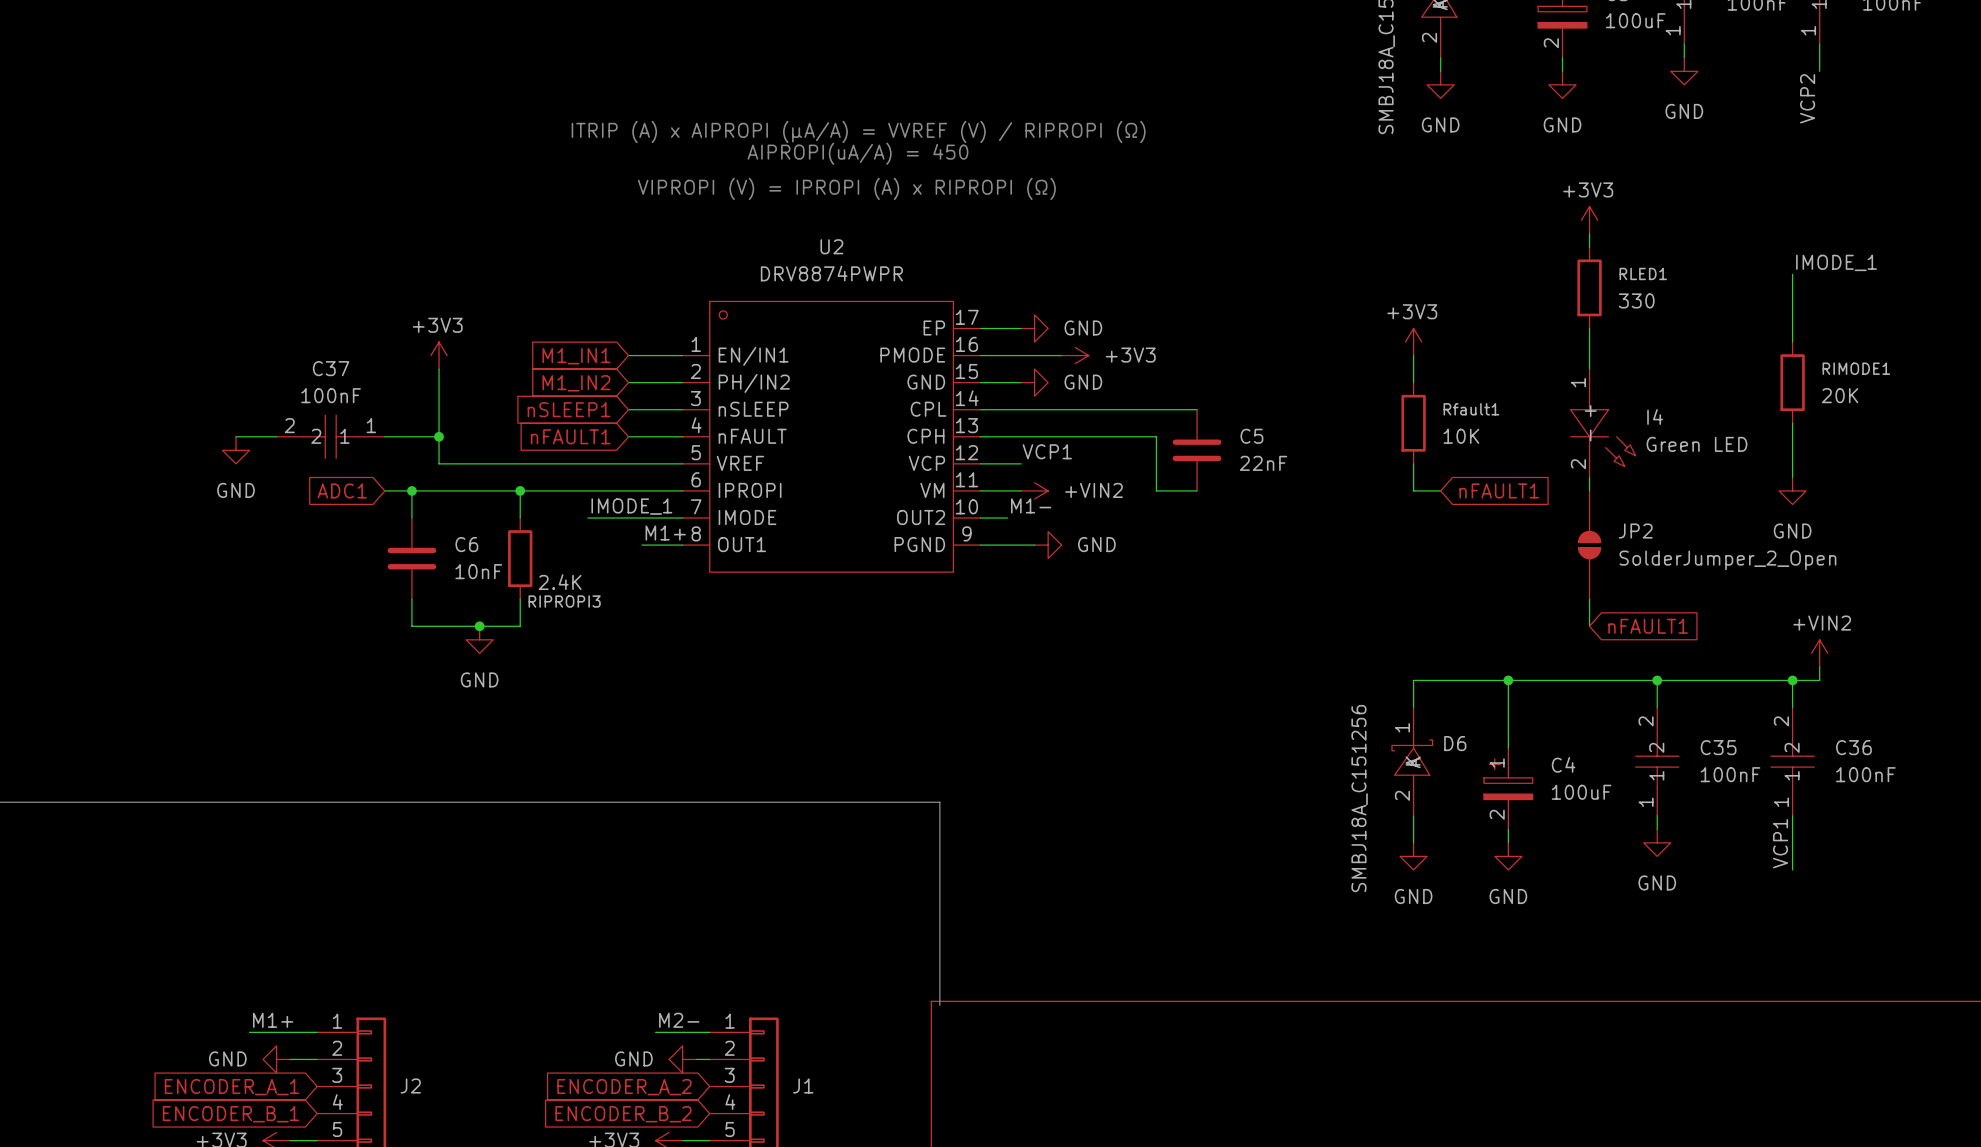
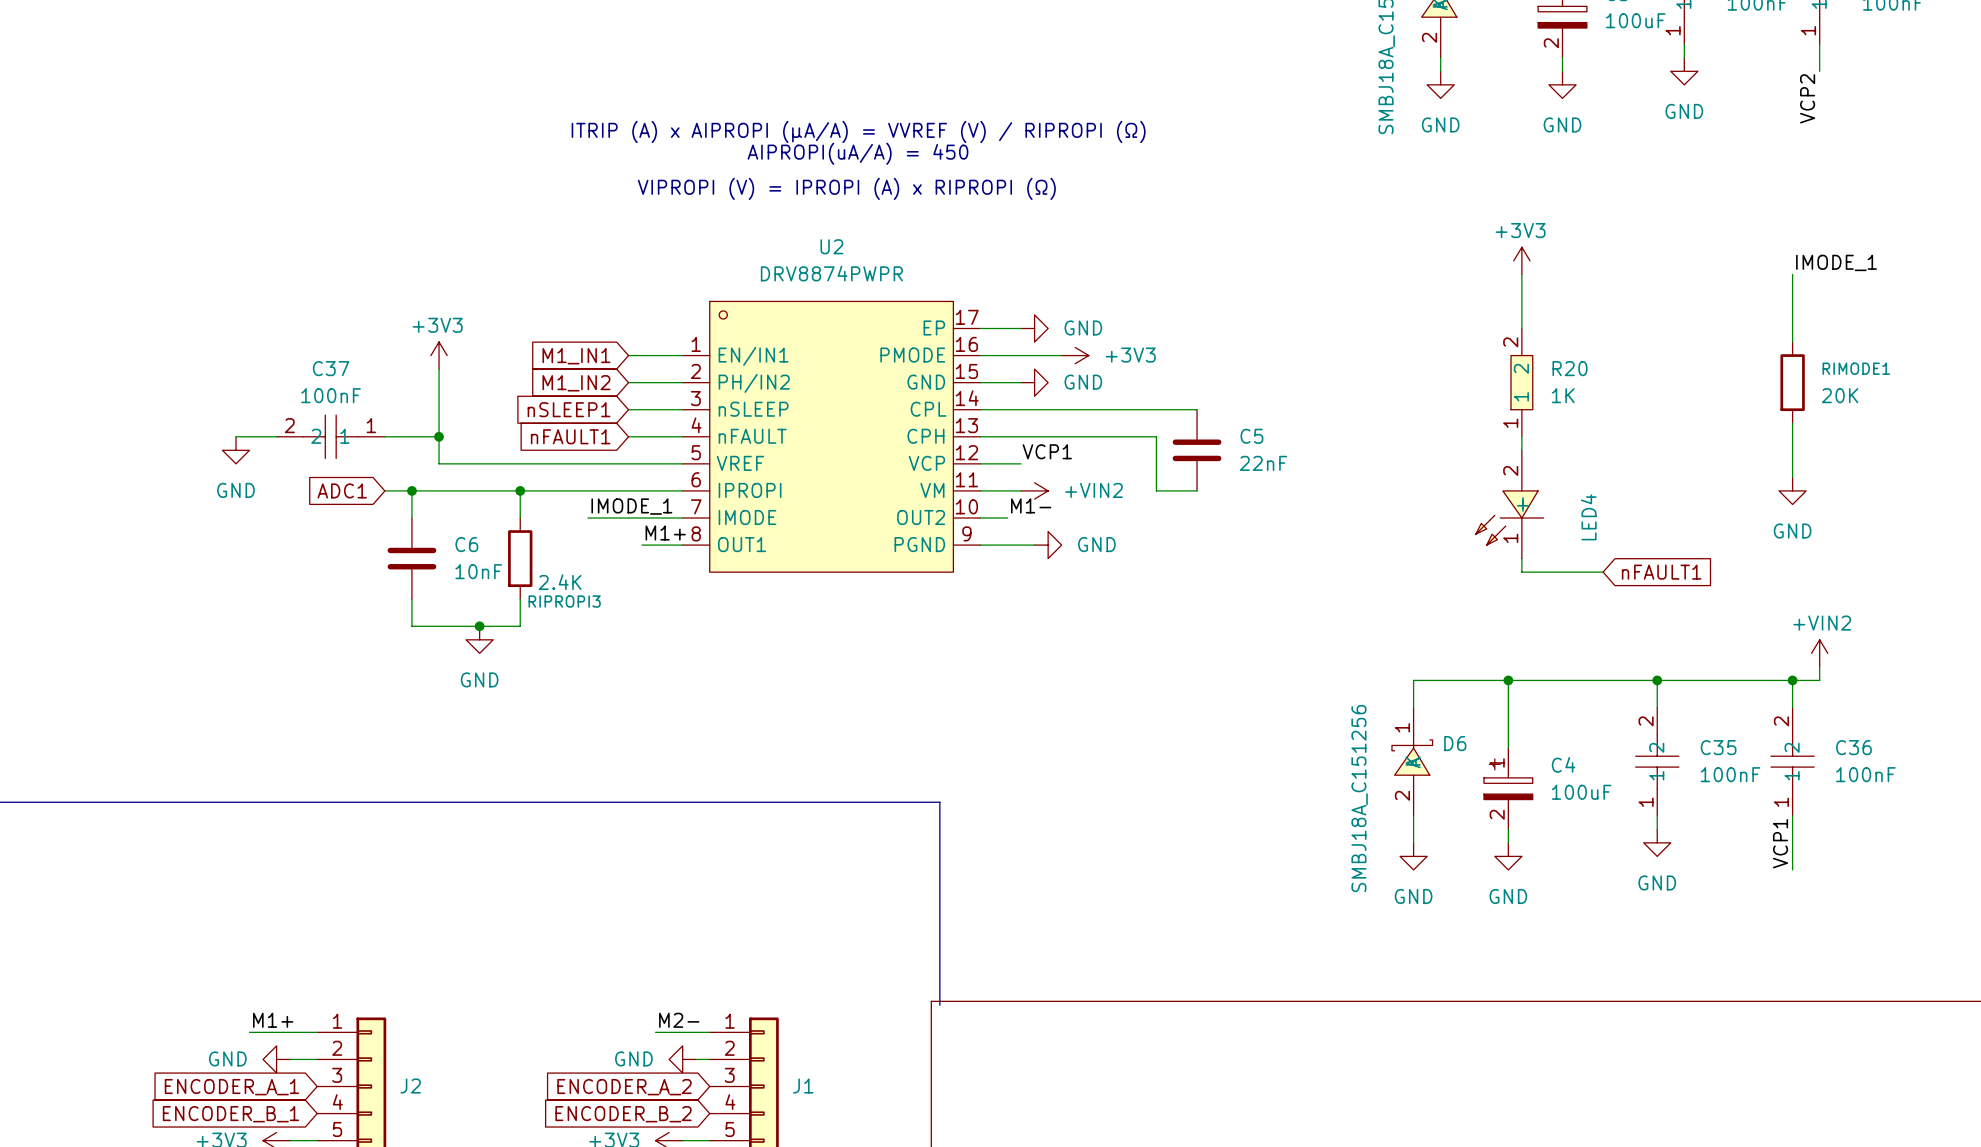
power symbol: +3V3 (1589, 220) -> none
wire: (1589, 233) (1589, 247) -> none
power symbol: none -> +3V3 (1521, 260)
wire: none -> (1521, 274) (1521, 328)
RLED1: 330 (1589, 287) -> none
wire: (1589, 328) (1589, 369) -> none
power symbol: +3V3 (1413, 342) -> none
wire: (1413, 355) (1413, 382) -> none
R20: none -> 1K (1521, 382)
Rfault1: 10K (1413, 423) -> none
I4: Green LED (1603, 423) -> none
wire: (1413, 463) (1413, 490) (1440, 490) -> none
wire: (1589, 477) (1589, 490) -> (1521, 436) (1521, 450)
global label: nFAULT1 (1499, 490) -> none
LED4: none -> (1509, 504)
JP2: SolderJumper_2_Open (1589, 545) -> none
wire: none -> (1521, 558) (1521, 572) (1603, 572)
wire: (1589, 599) (1589, 626) -> none
global label position: nFAULT1 (1648, 626) -> nFAULT1 (1661, 572)

